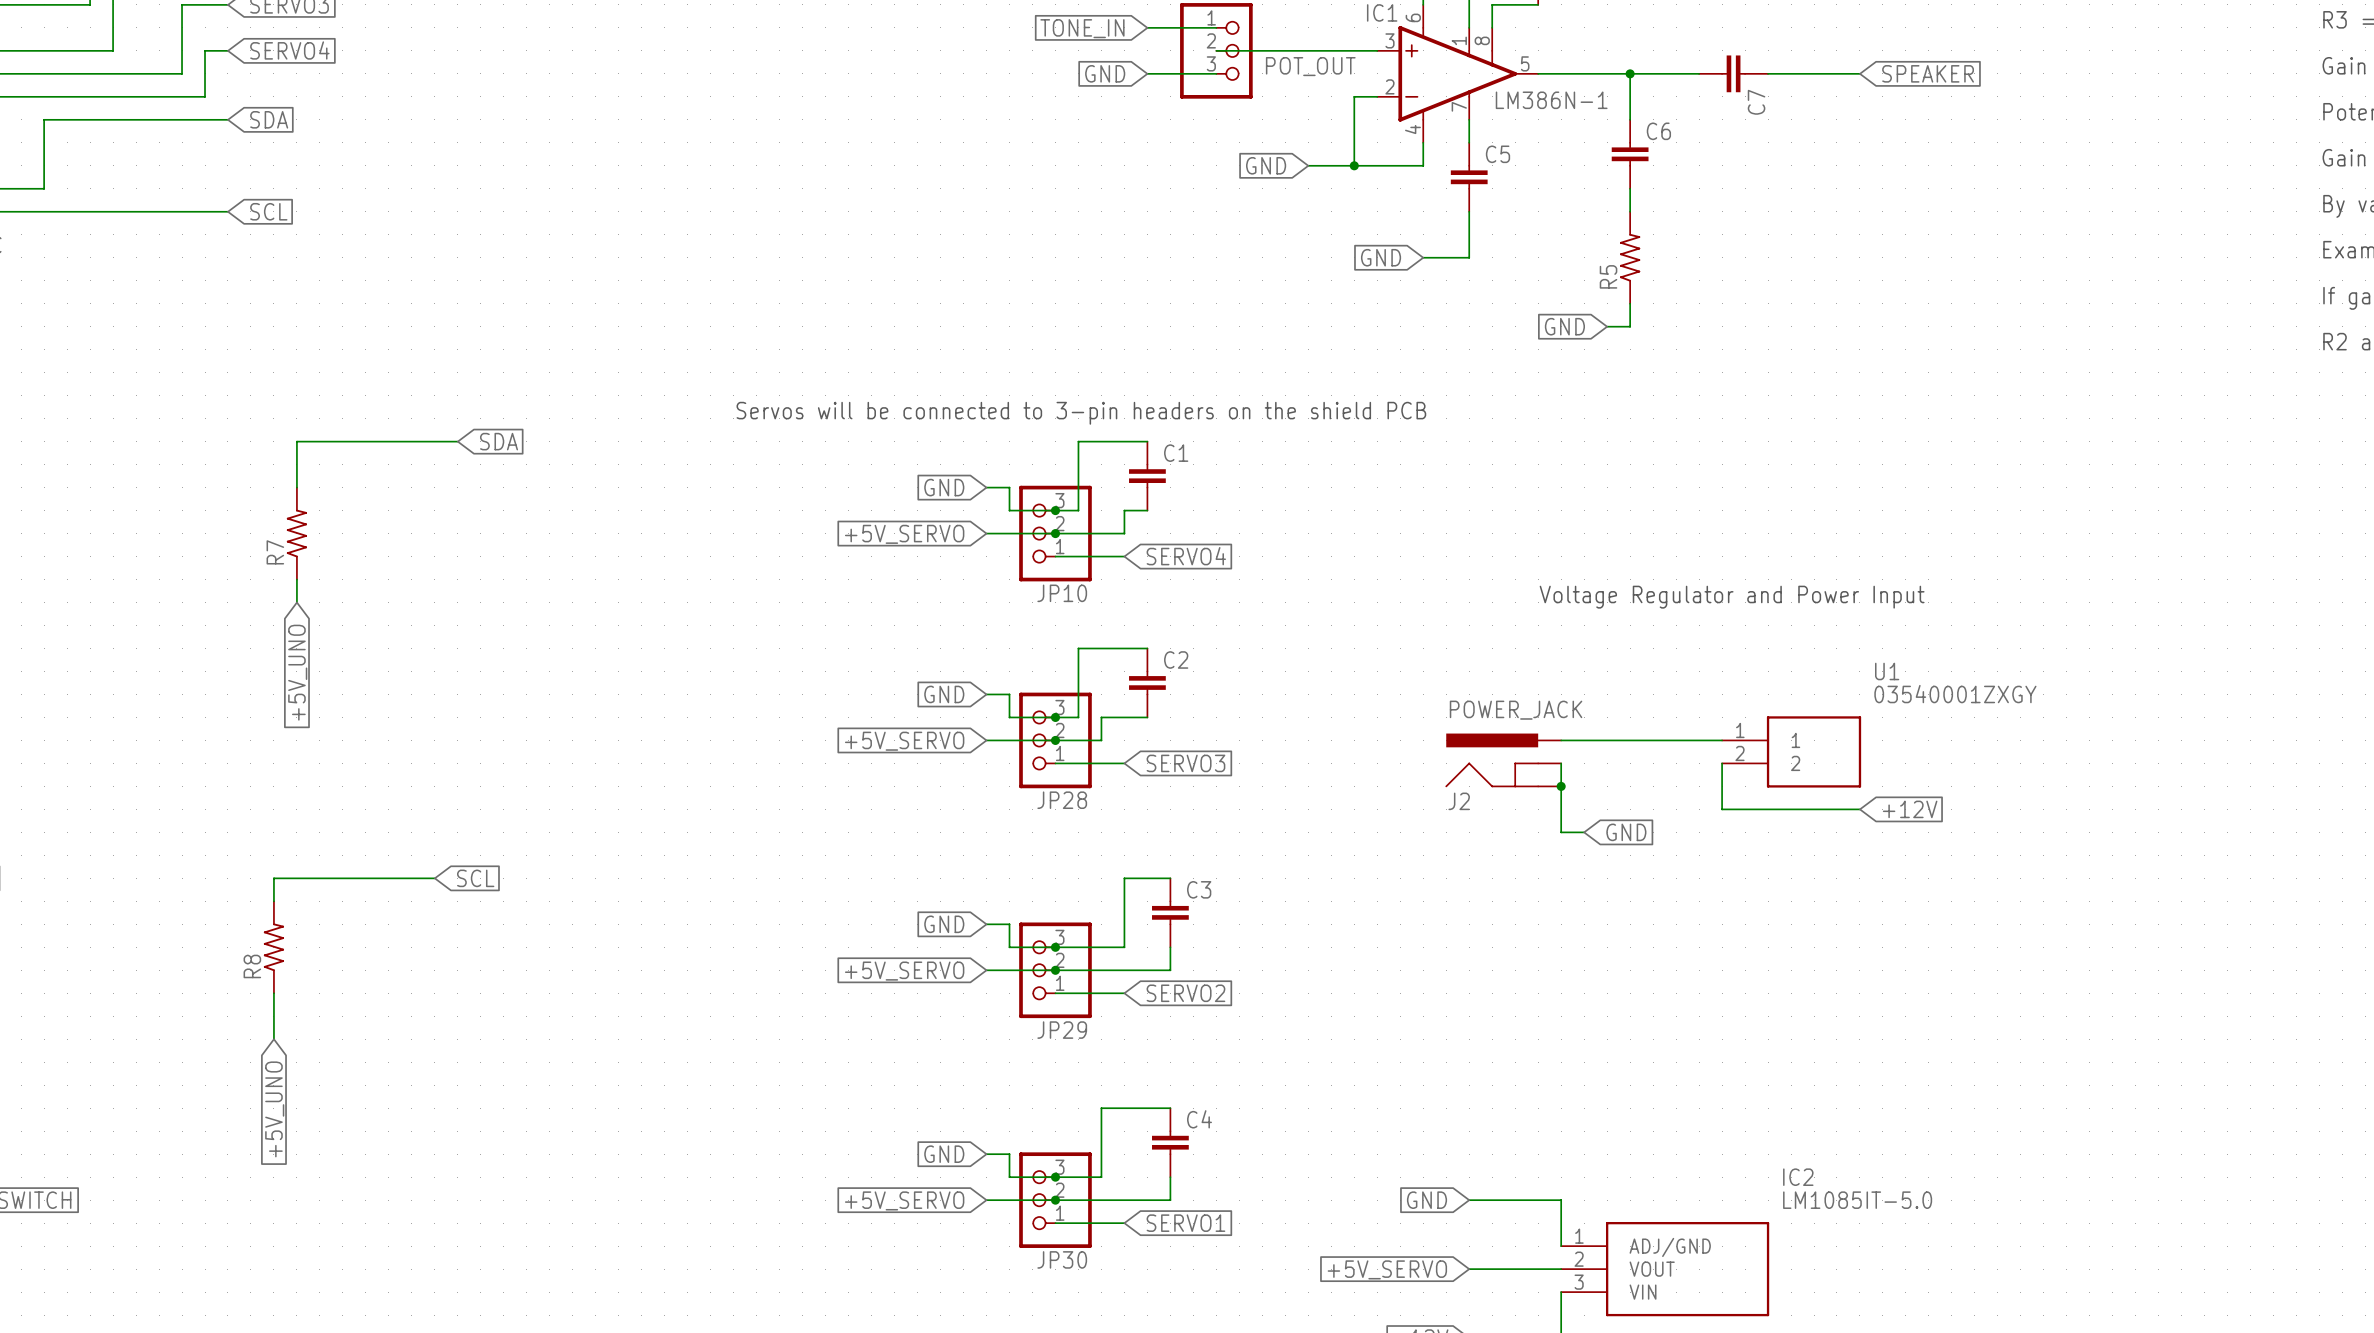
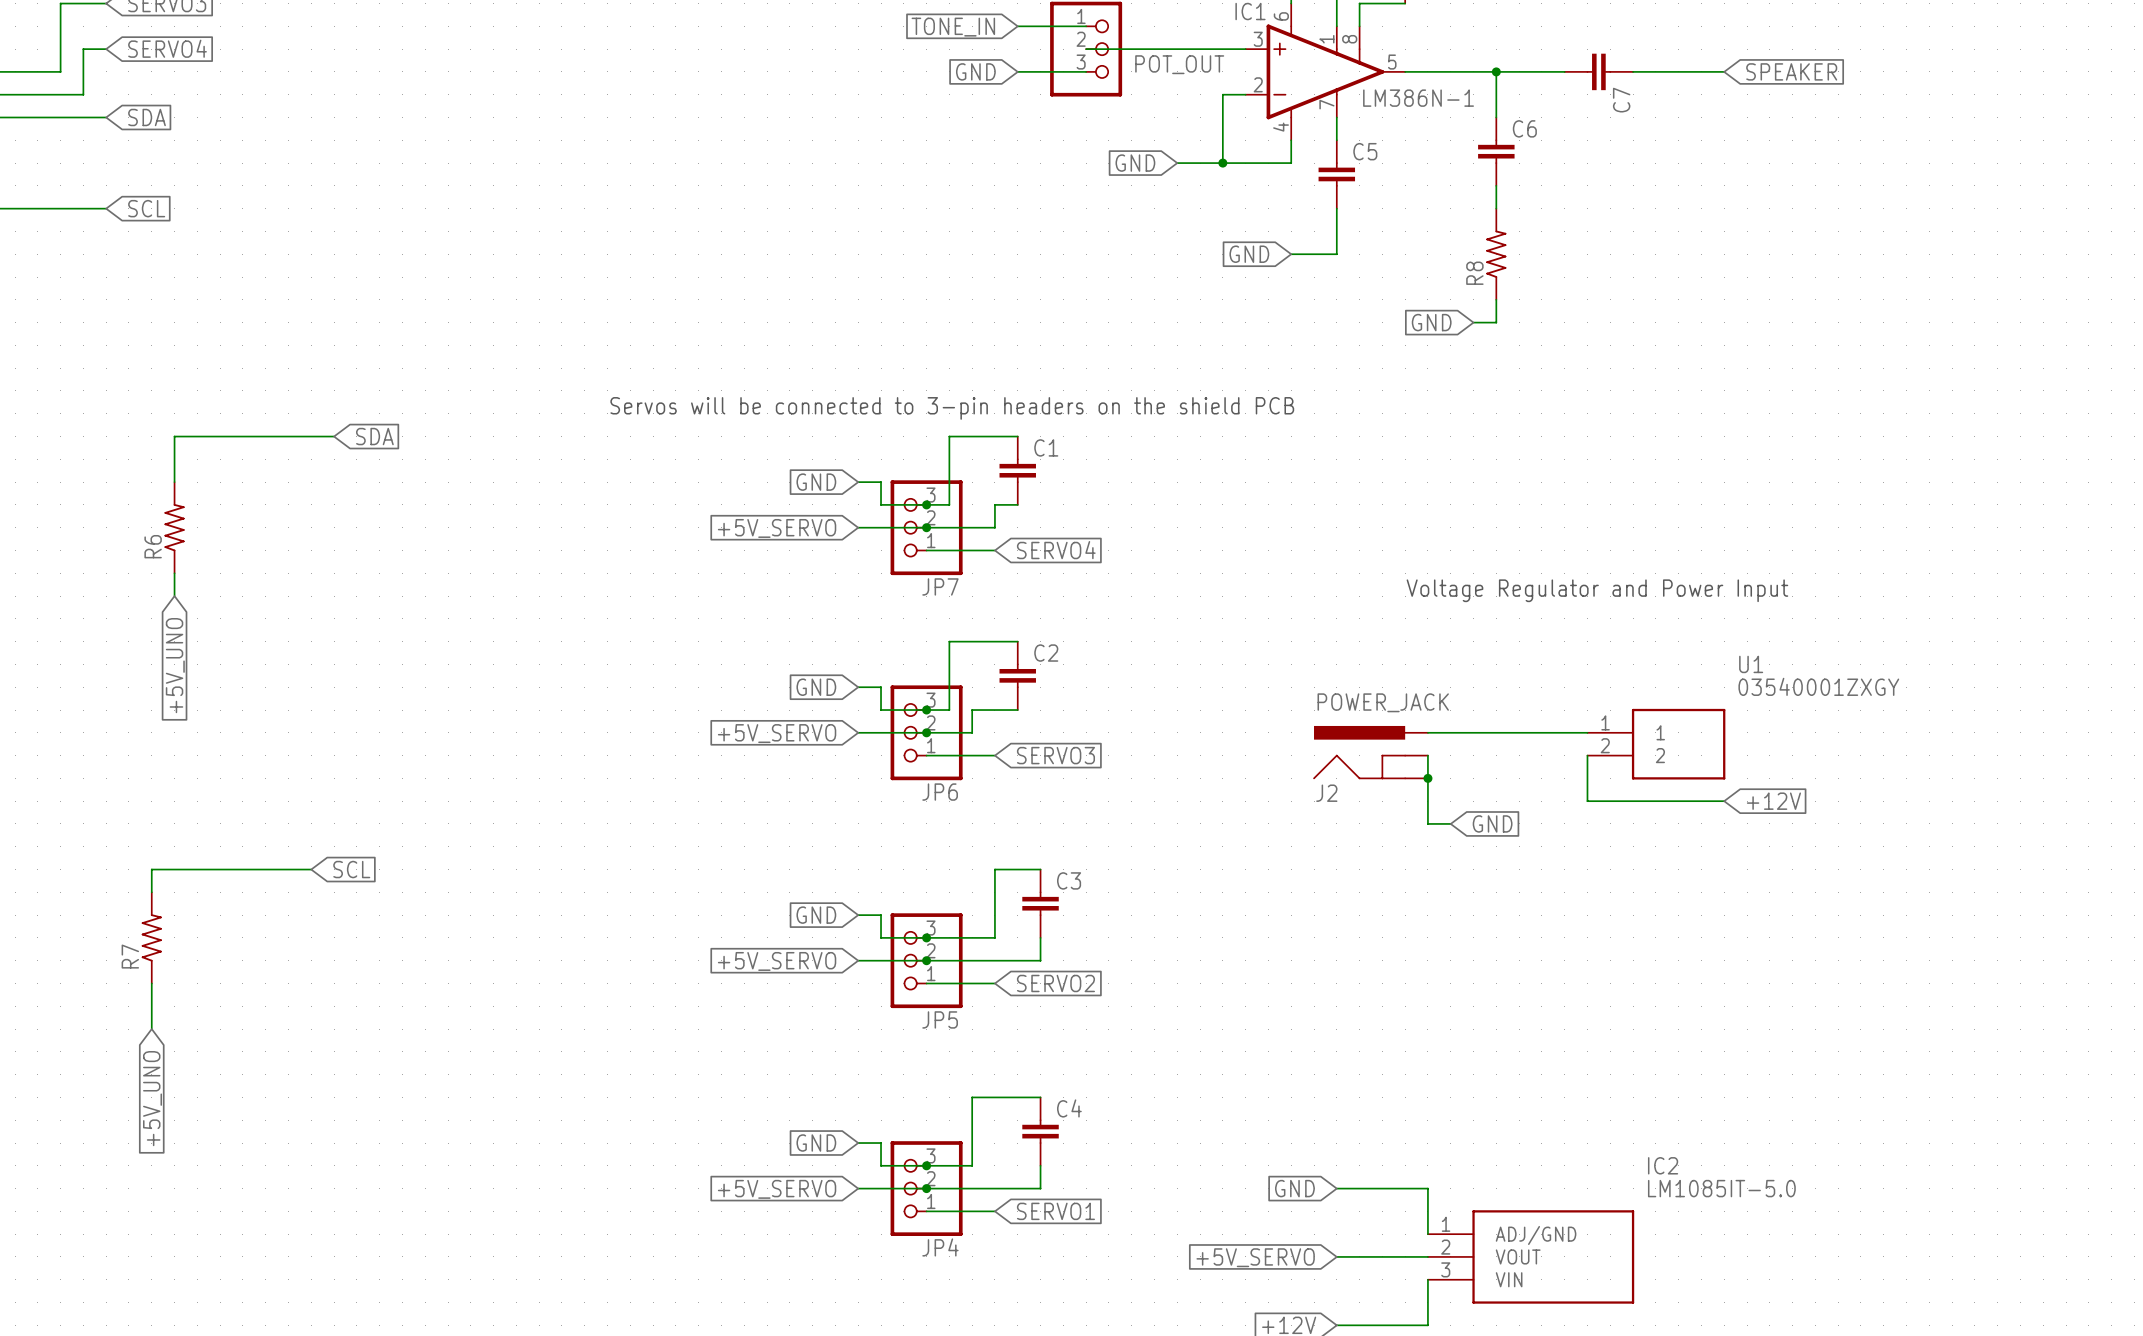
R5 name: R5 (1608, 276) -> R8 (1474, 273)
R7 name: R7 (275, 552) -> R6 (153, 546)
JP10 name: JP10 (1062, 593) -> JP7 (940, 586)
JP28 name: JP28 (1062, 800) -> JP6 (940, 792)
R8 name: R8 (252, 966) -> R7 (130, 956)
JP29 name: JP29 (1062, 1030) -> JP5 (940, 1019)
JP30 name: JP30 (1062, 1259) -> JP4 (940, 1247)

